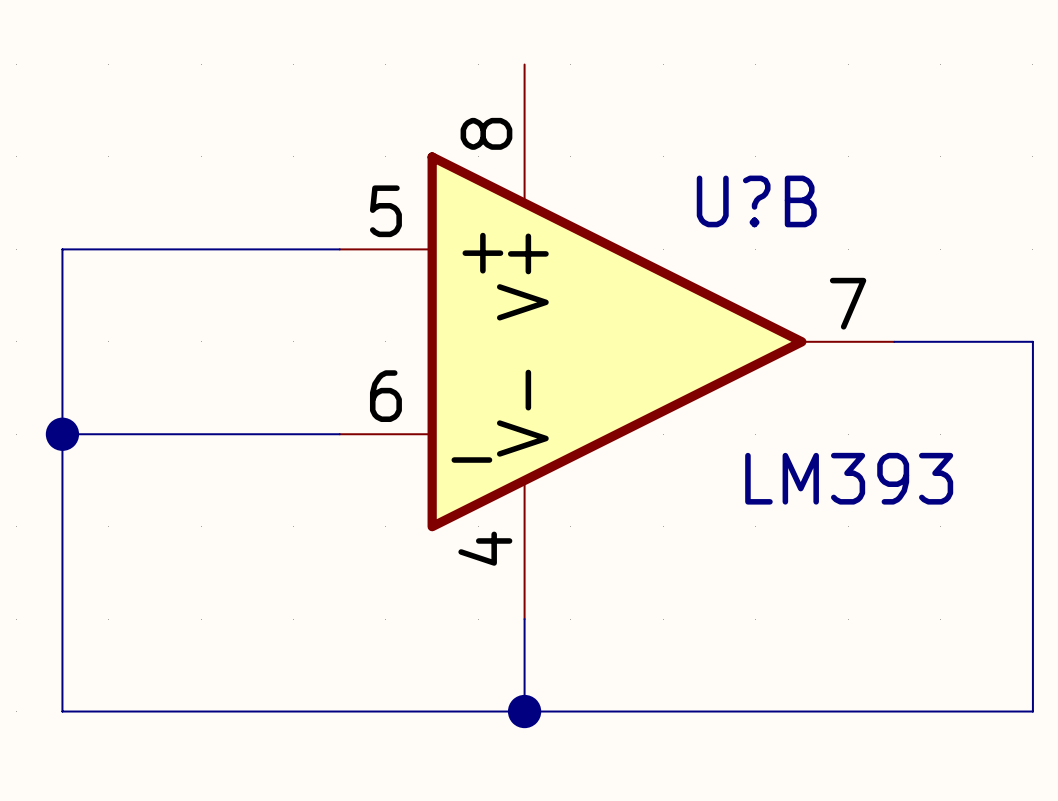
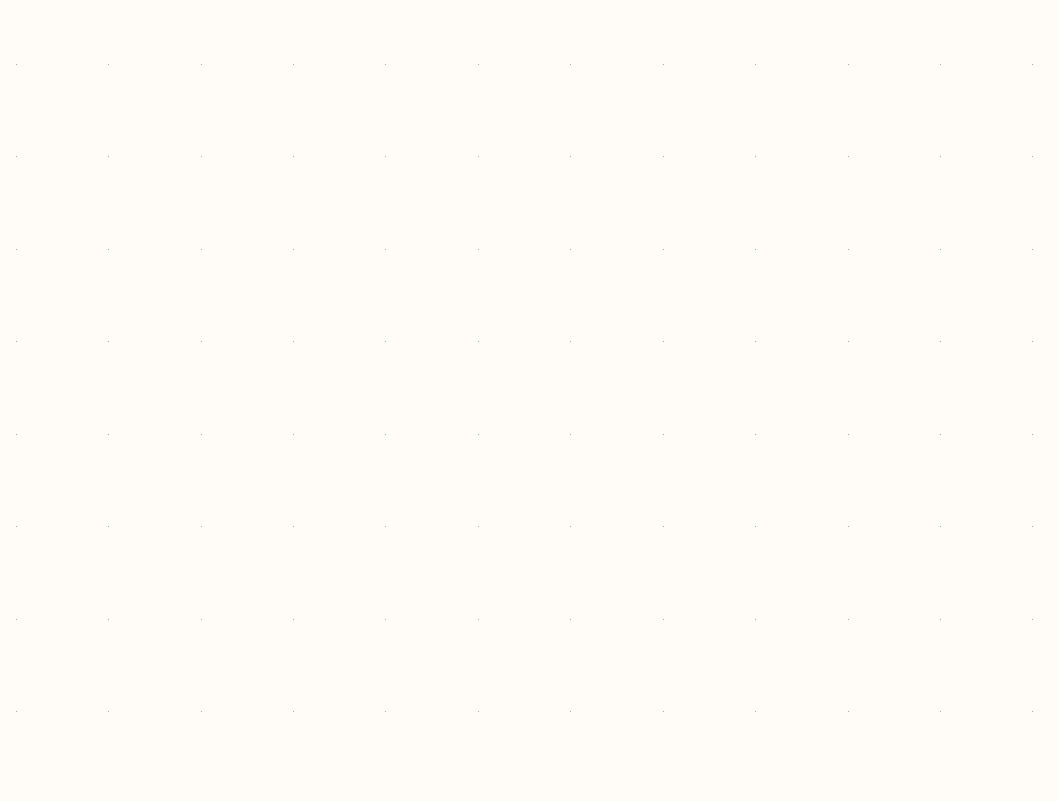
wire: (339, 249) (62, 249) (62, 711) (1032, 711) (1032, 341) (894, 341) -> none
U?B: LM393 (617, 341) -> none
wire: (62, 434) (339, 434) -> none
junction: (62, 434) -> none
wire: (524, 619) (524, 711) -> none
junction: (524, 711) -> none

